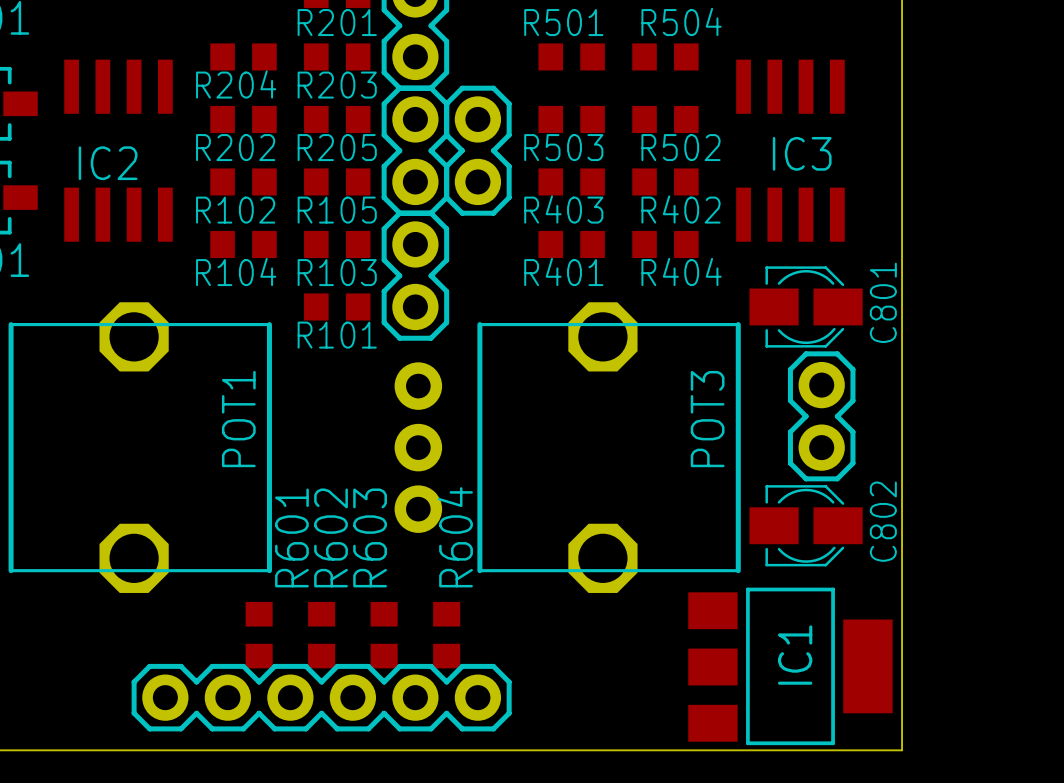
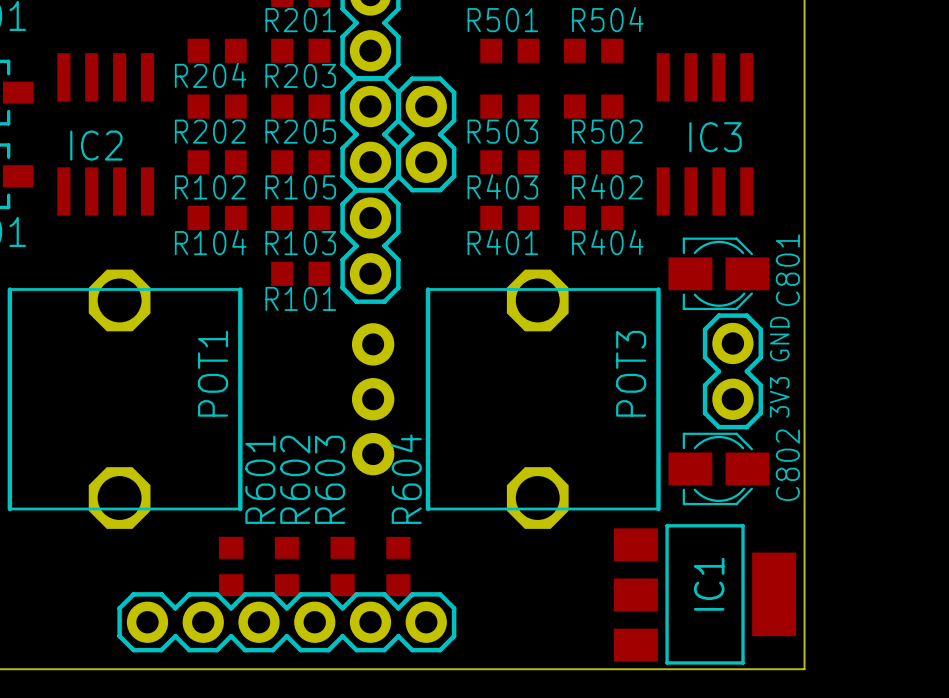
text: none -> GND (779, 338)
text: none -> 3V3 (779, 397)

